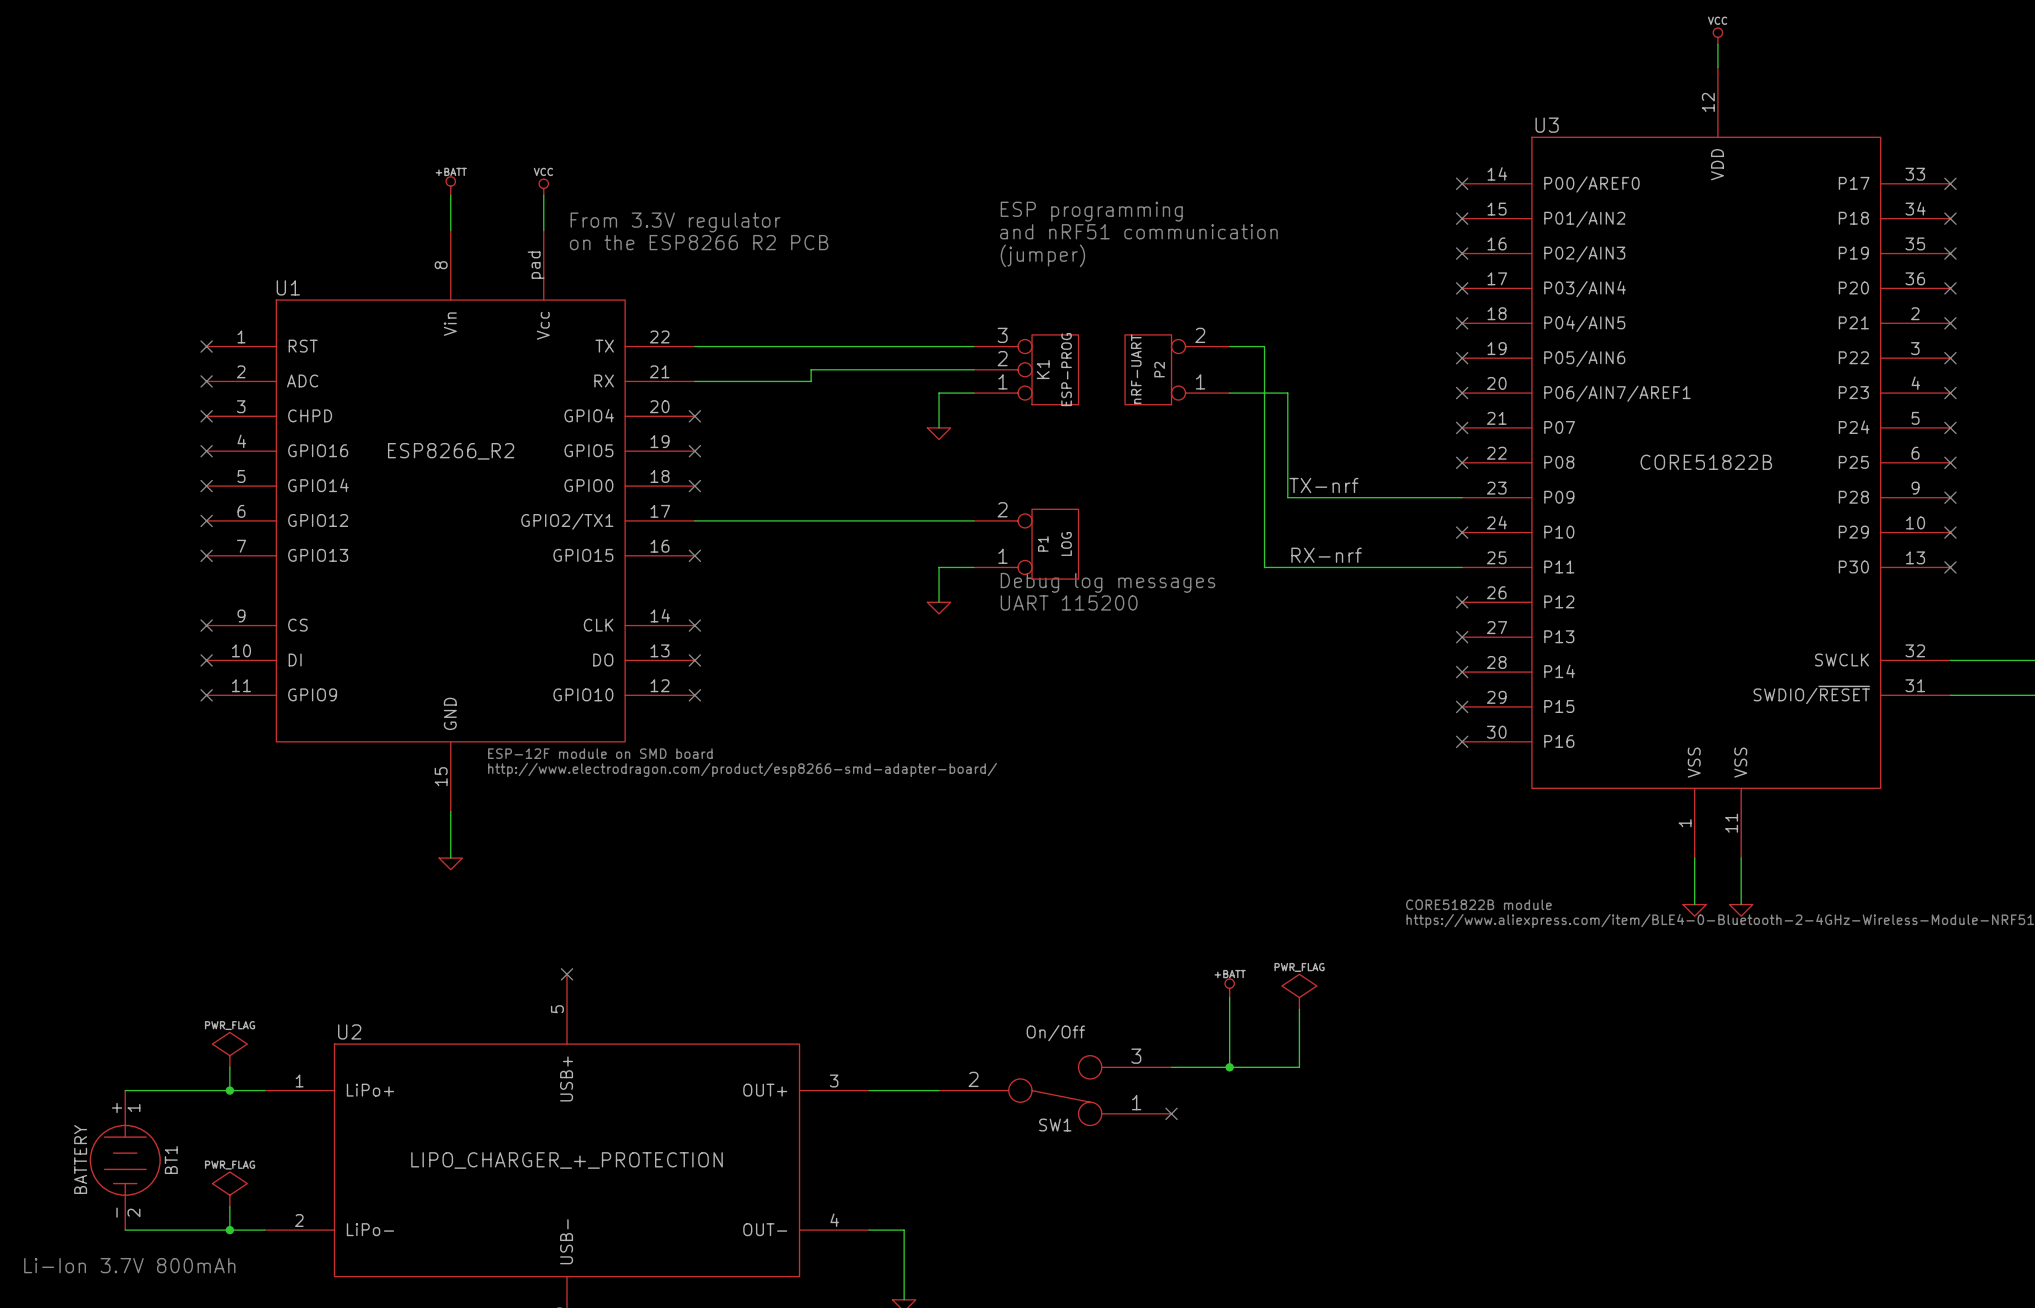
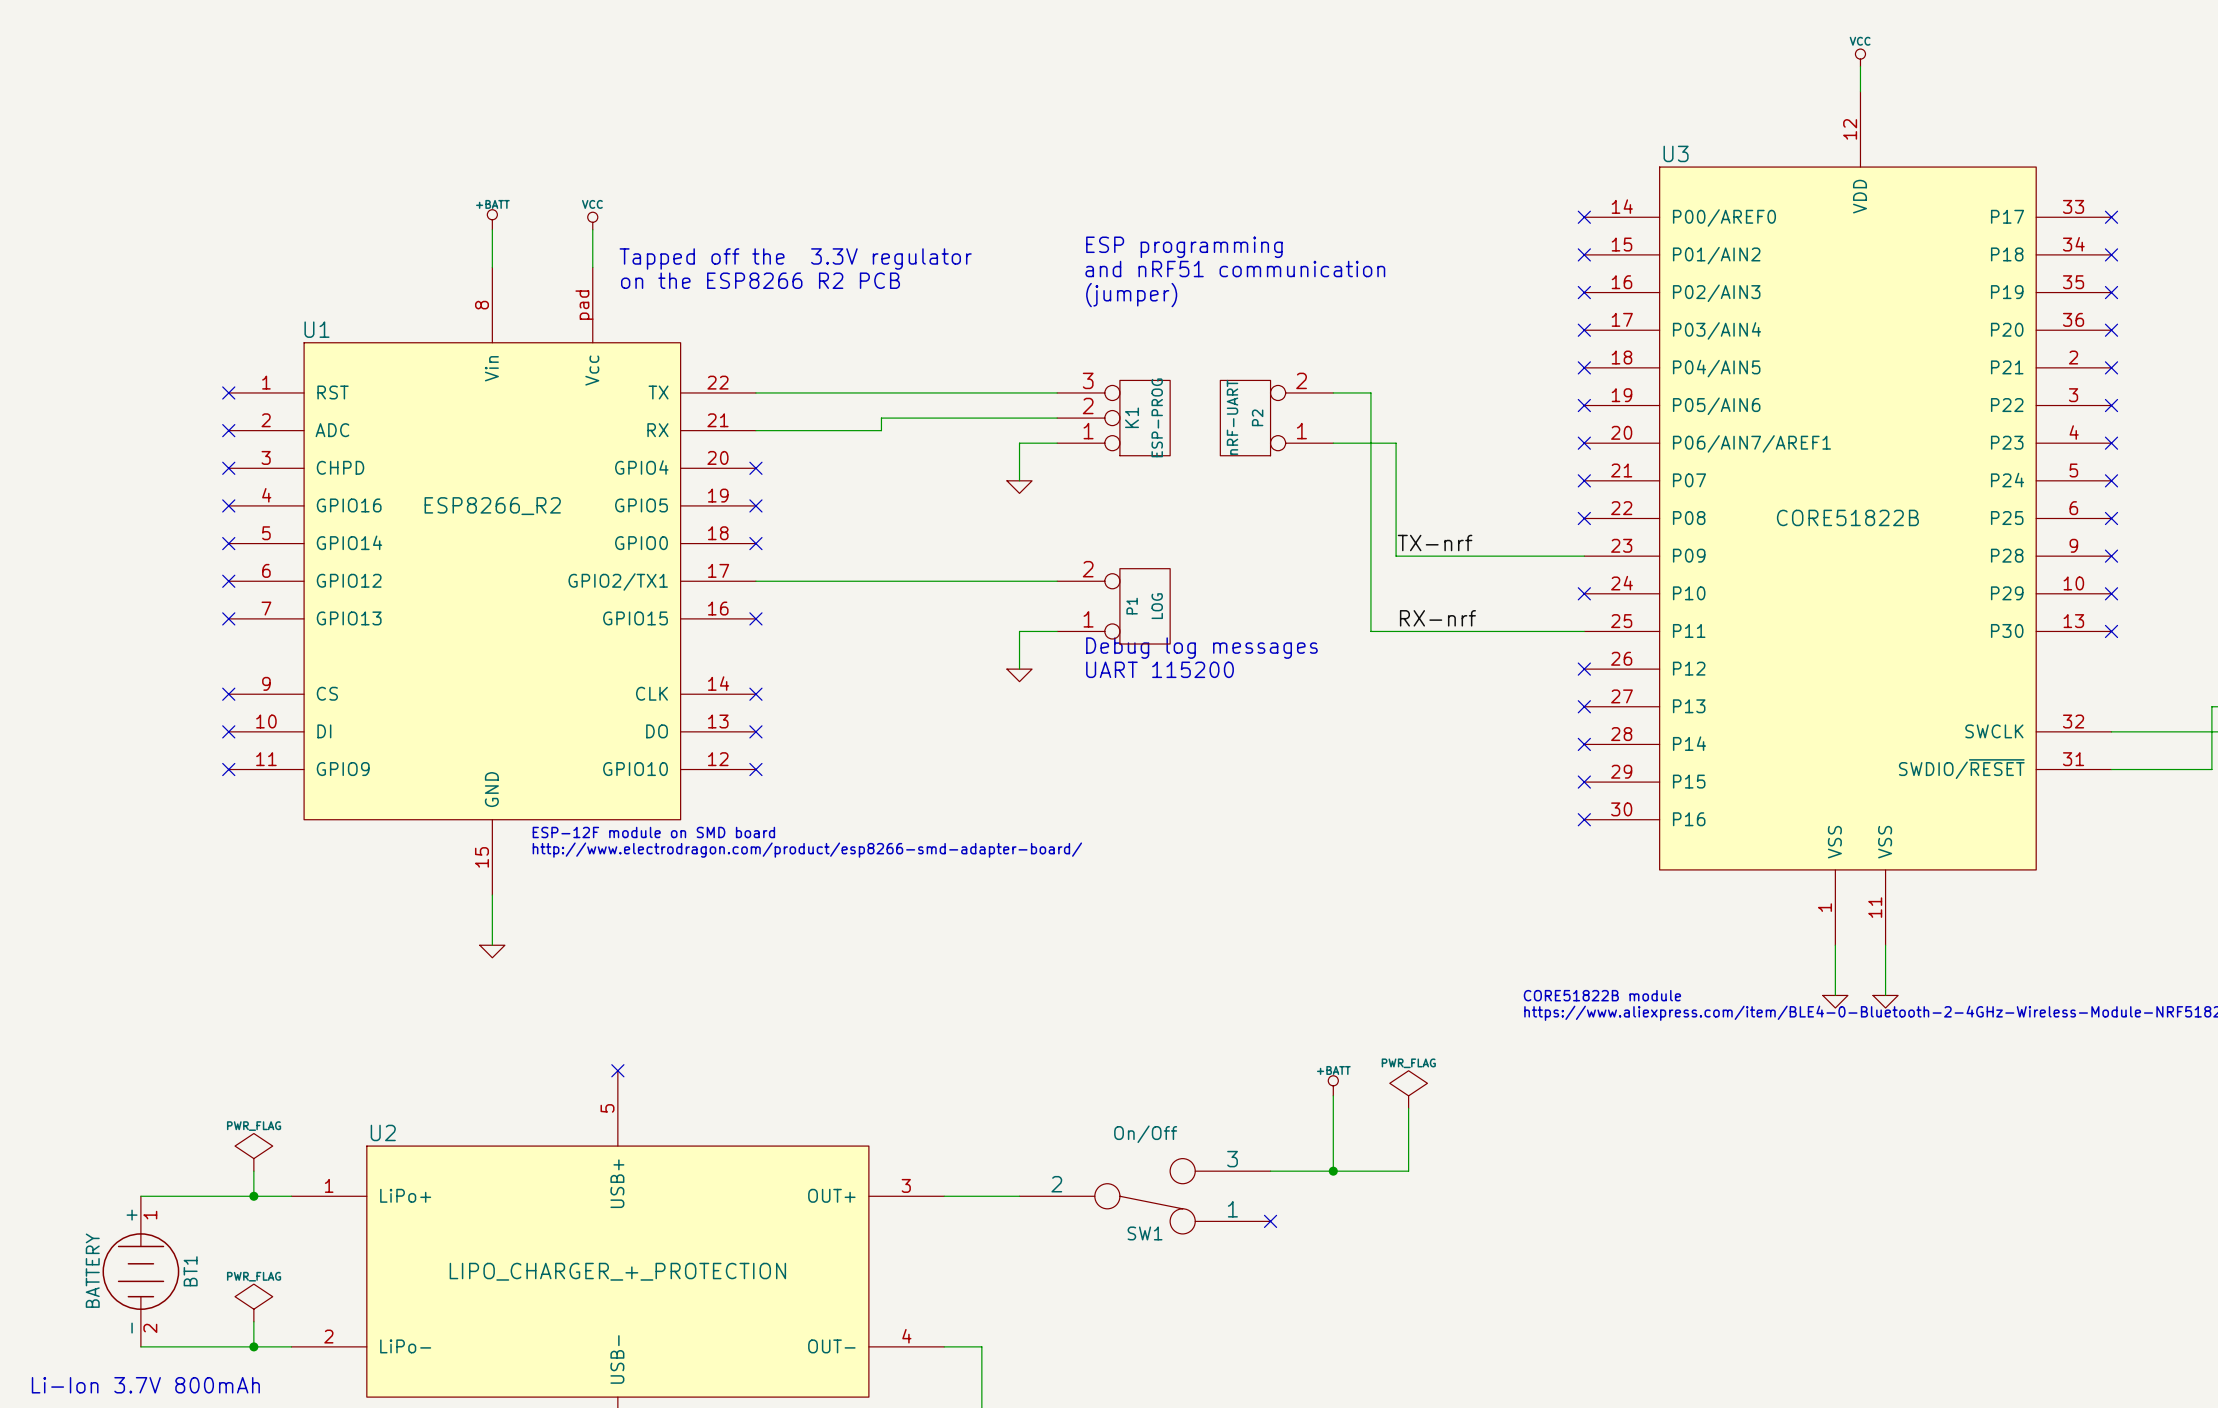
text: From 3.3V regulator (675, 222) -> Tapped off the 3.3V regulator (795, 258)

